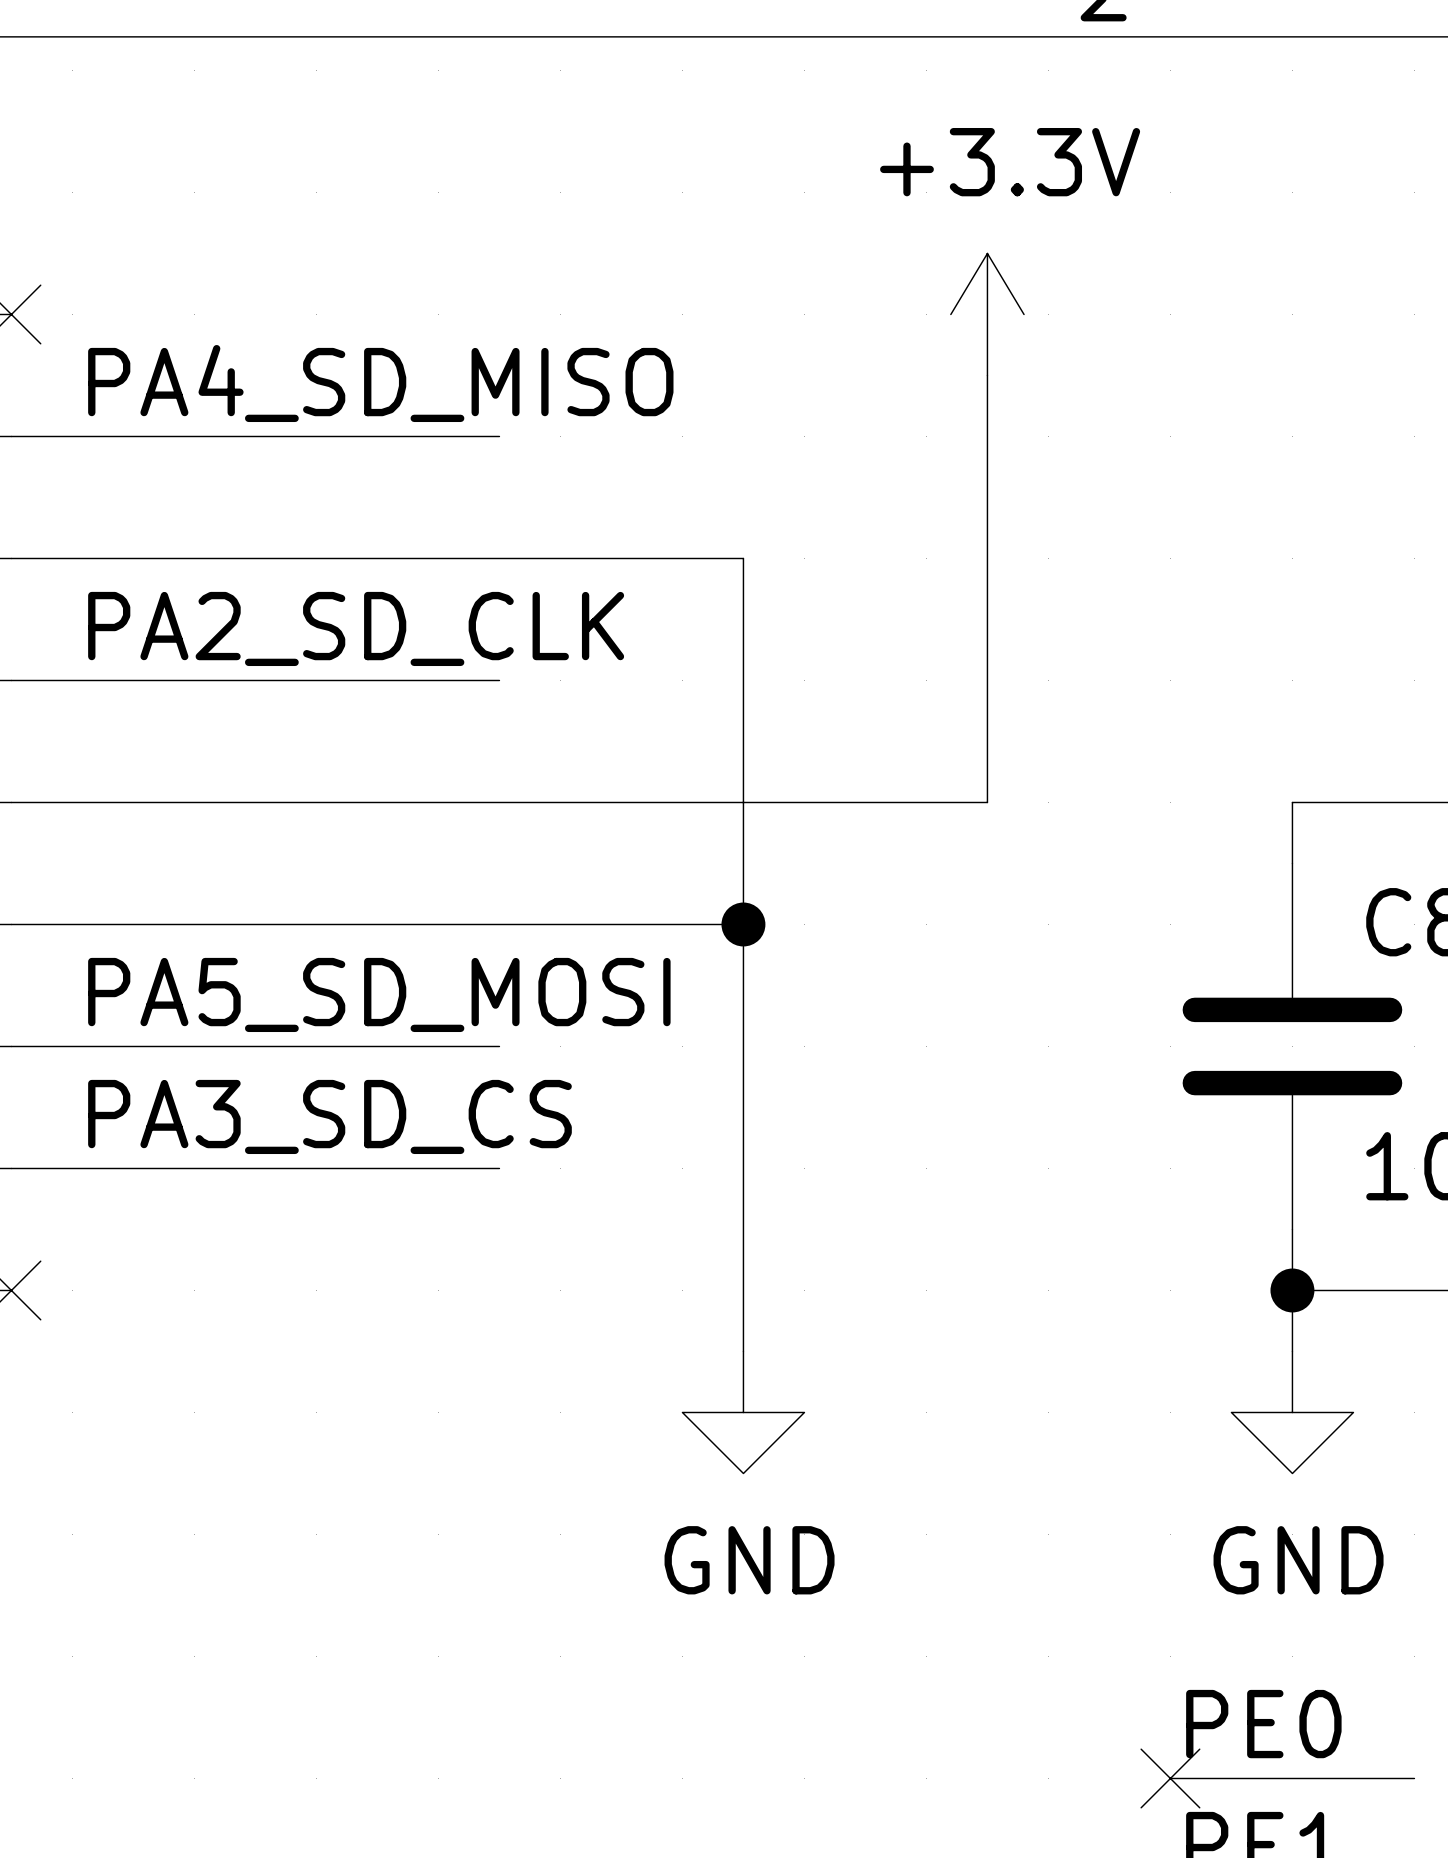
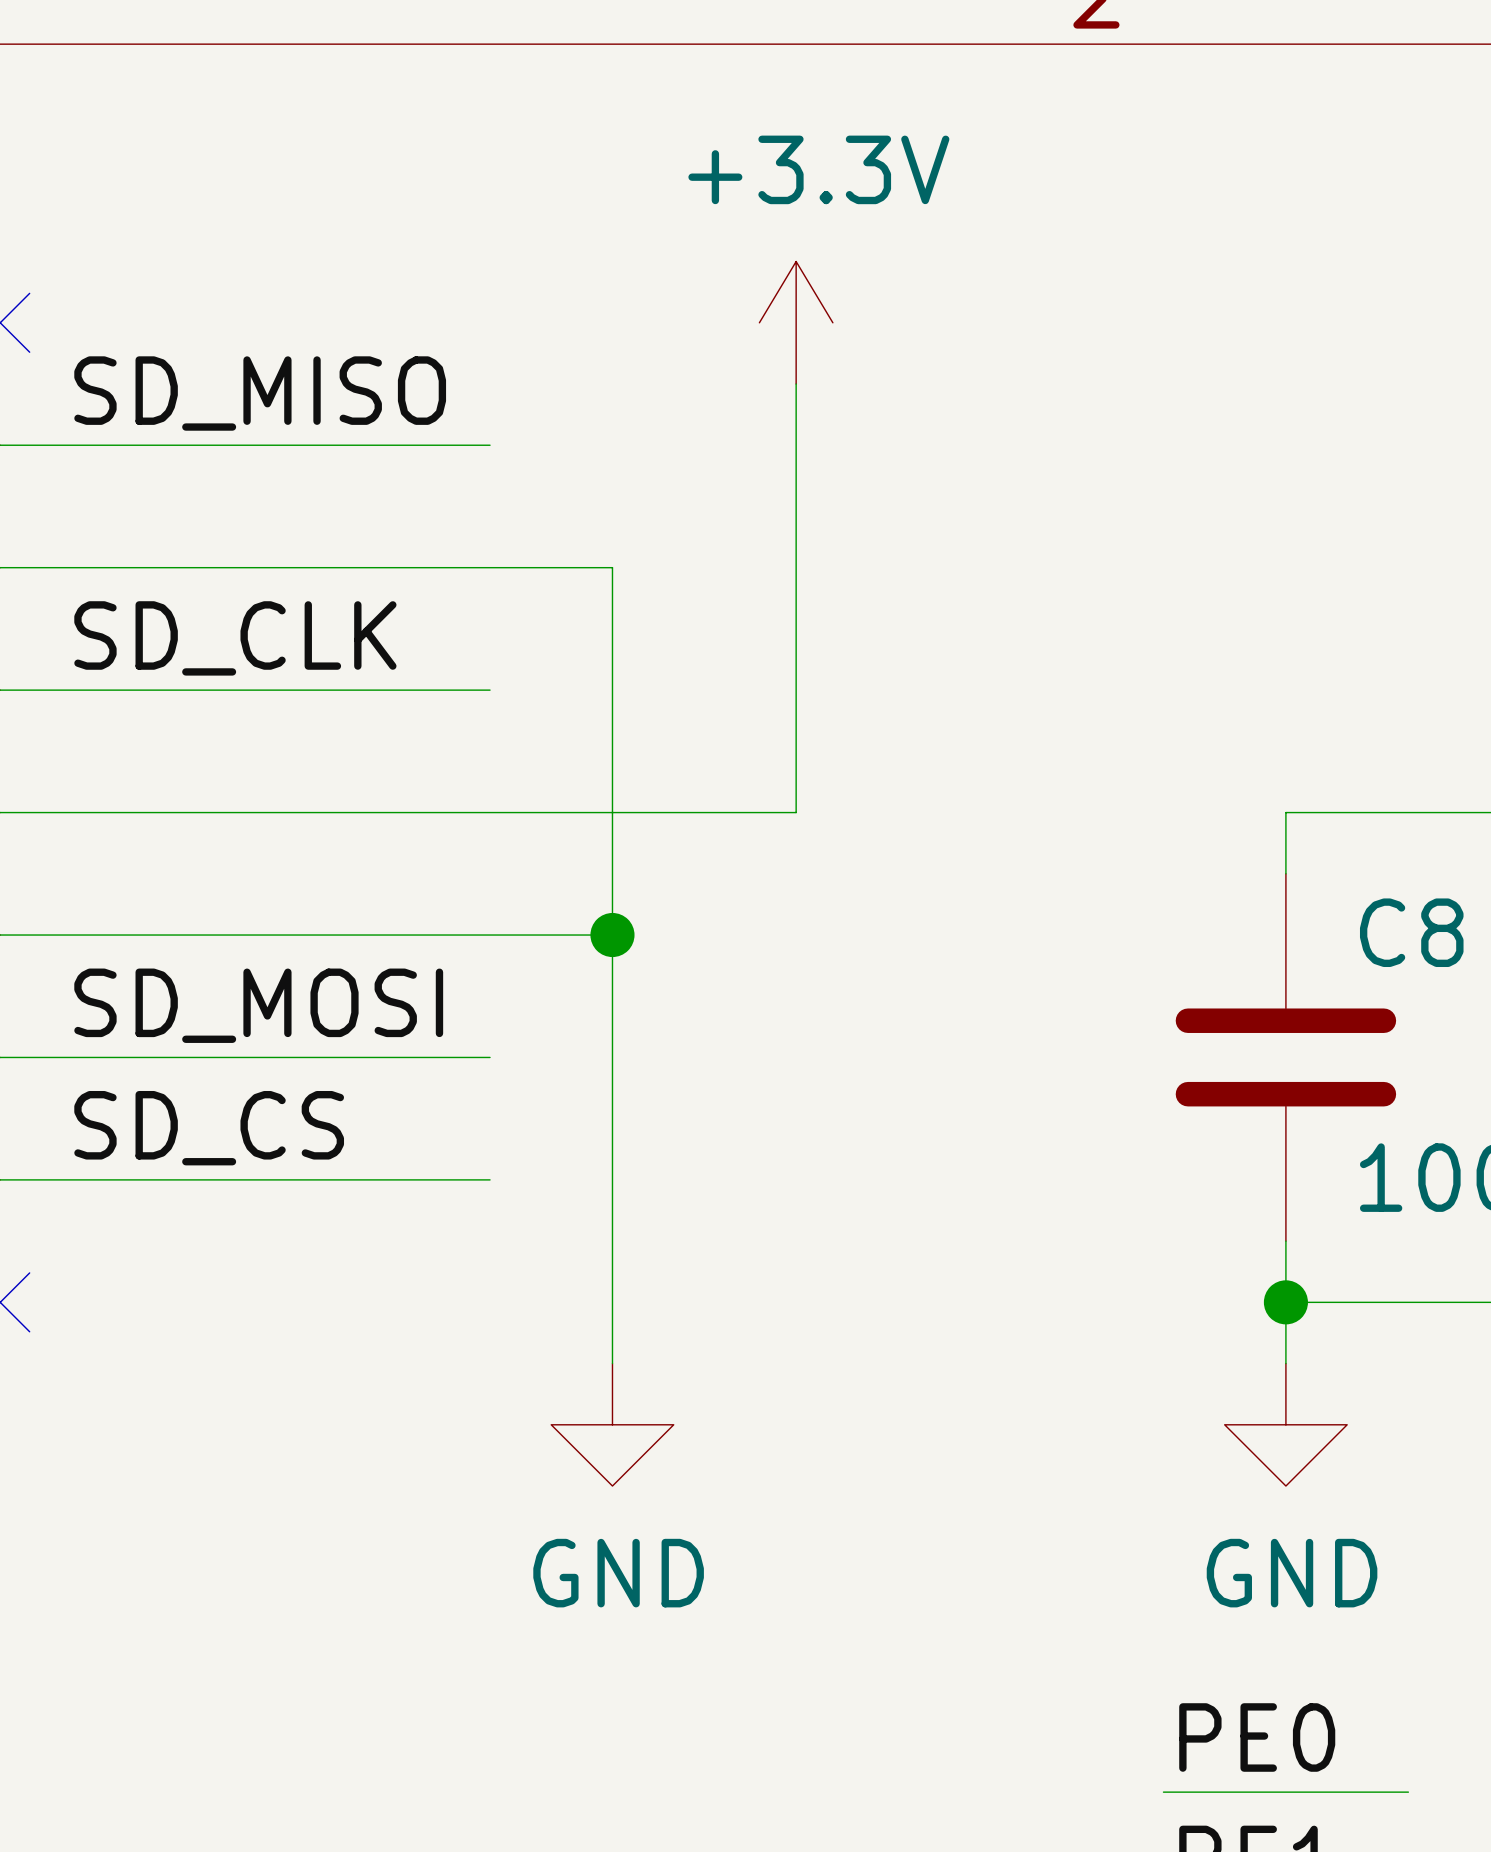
power symbol position: +3.3V (987, 314) -> +3.3V (796, 322)
wire: (987, 375) (987, 802) (804, 802) -> (796, 384) (796, 812)
label: PA4_SD_MISO (380, 383) -> SD_MISO (260, 393)
wire: (621, 558) (743, 558) (743, 1351) -> (612, 567) (612, 1363)
label: PA2_SD_CLK (356, 628) -> SD_CLK (235, 638)
wire: (621, 924) (743, 924) -> none
junction position: (743, 924) -> (612, 935)
label: PA5_SD_MOSI (379, 994) -> SD_MOSI (258, 1005)
label: PA3_SD_CS (329, 1116) -> SD_CS (209, 1128)
power symbol position: GND (743, 1412) -> GND (612, 1424)
no-connect mark: (1170, 1778) -> none

